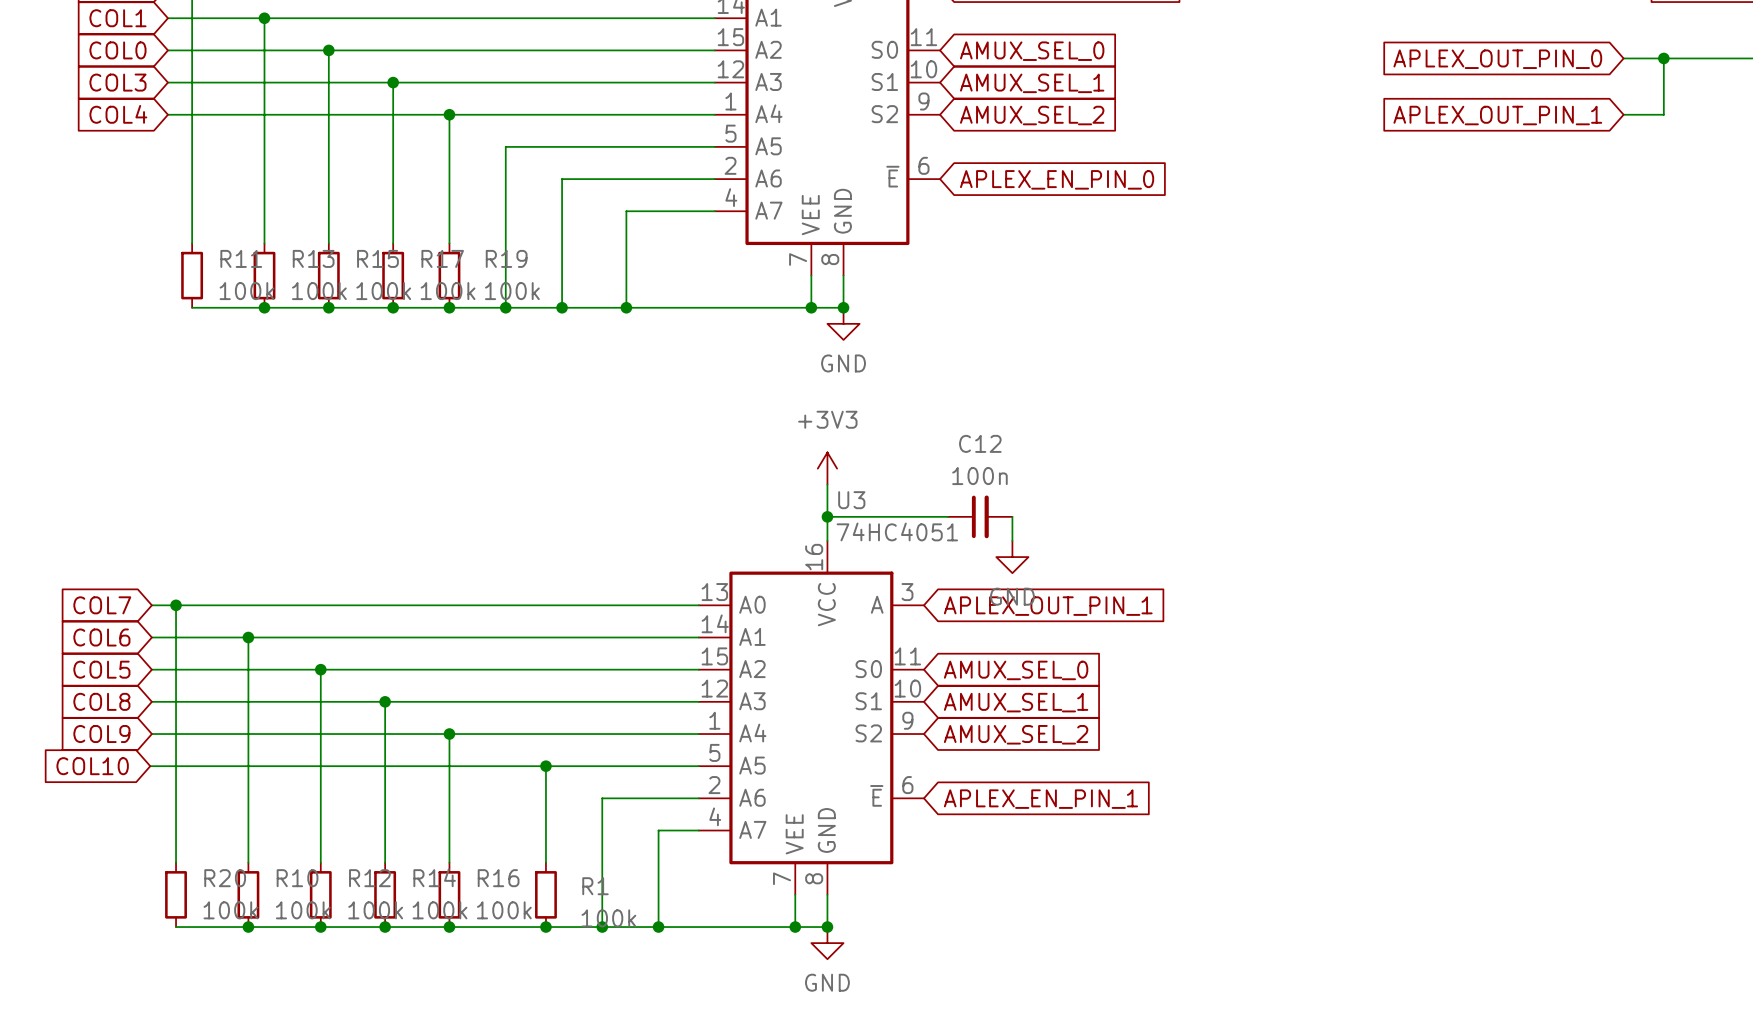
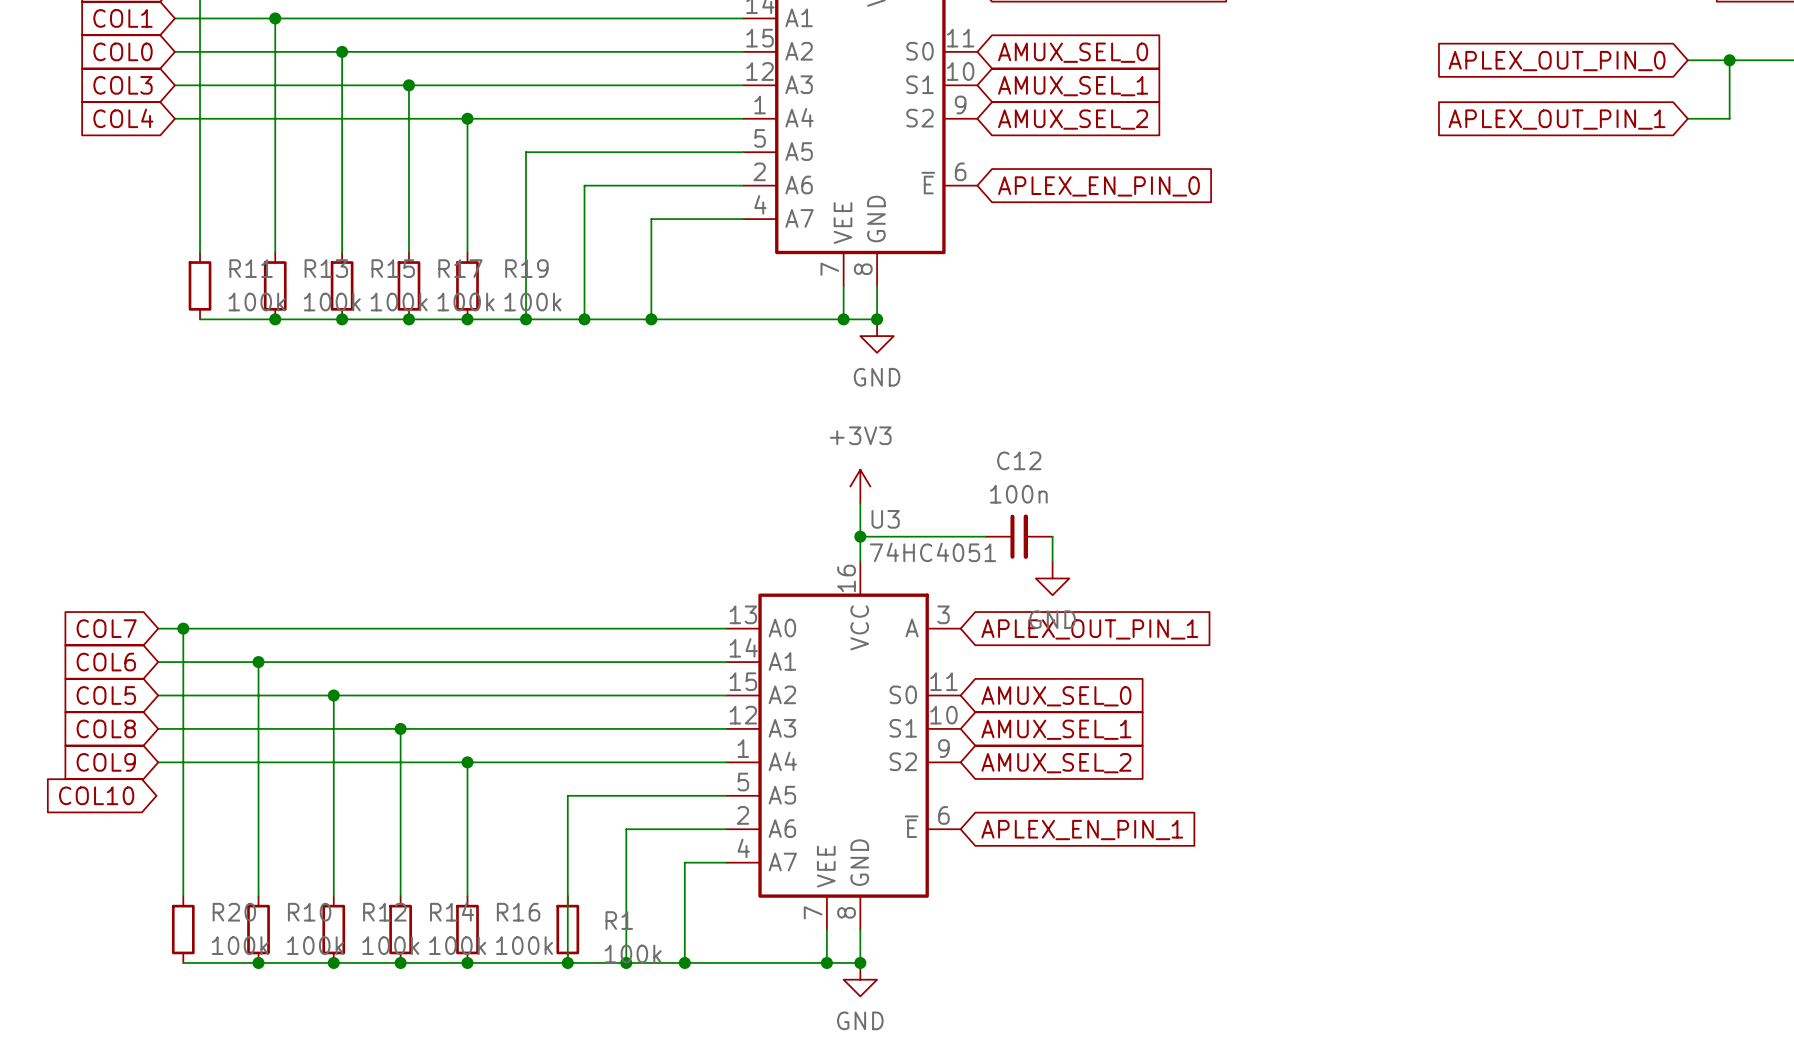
wire: (150, 766) (545, 766) -> none
junction: (545, 766) -> none
wire: none -> (567, 896) (567, 962)

